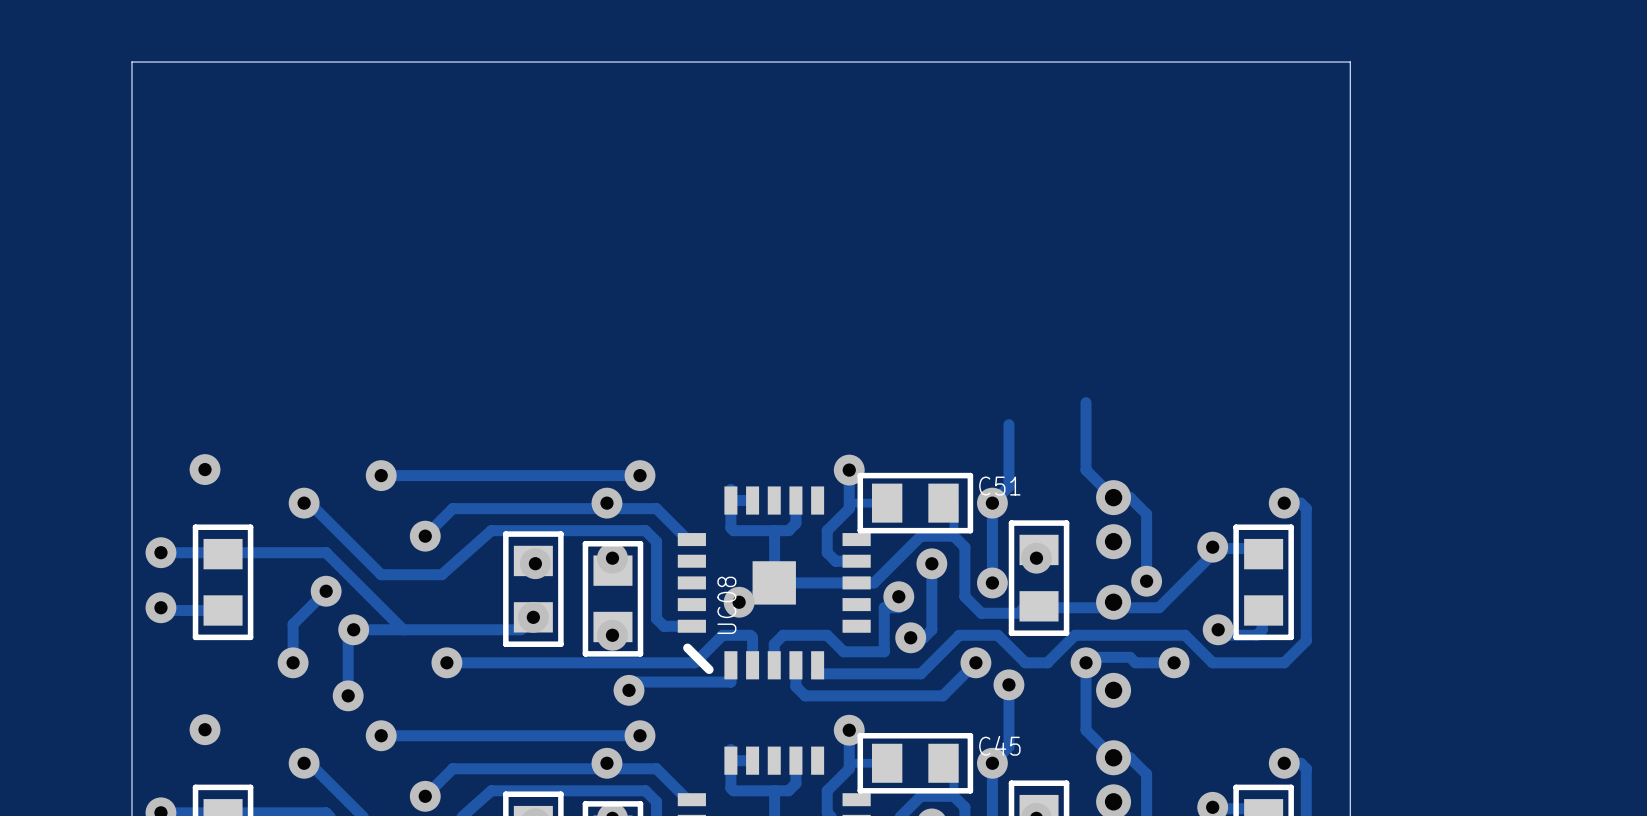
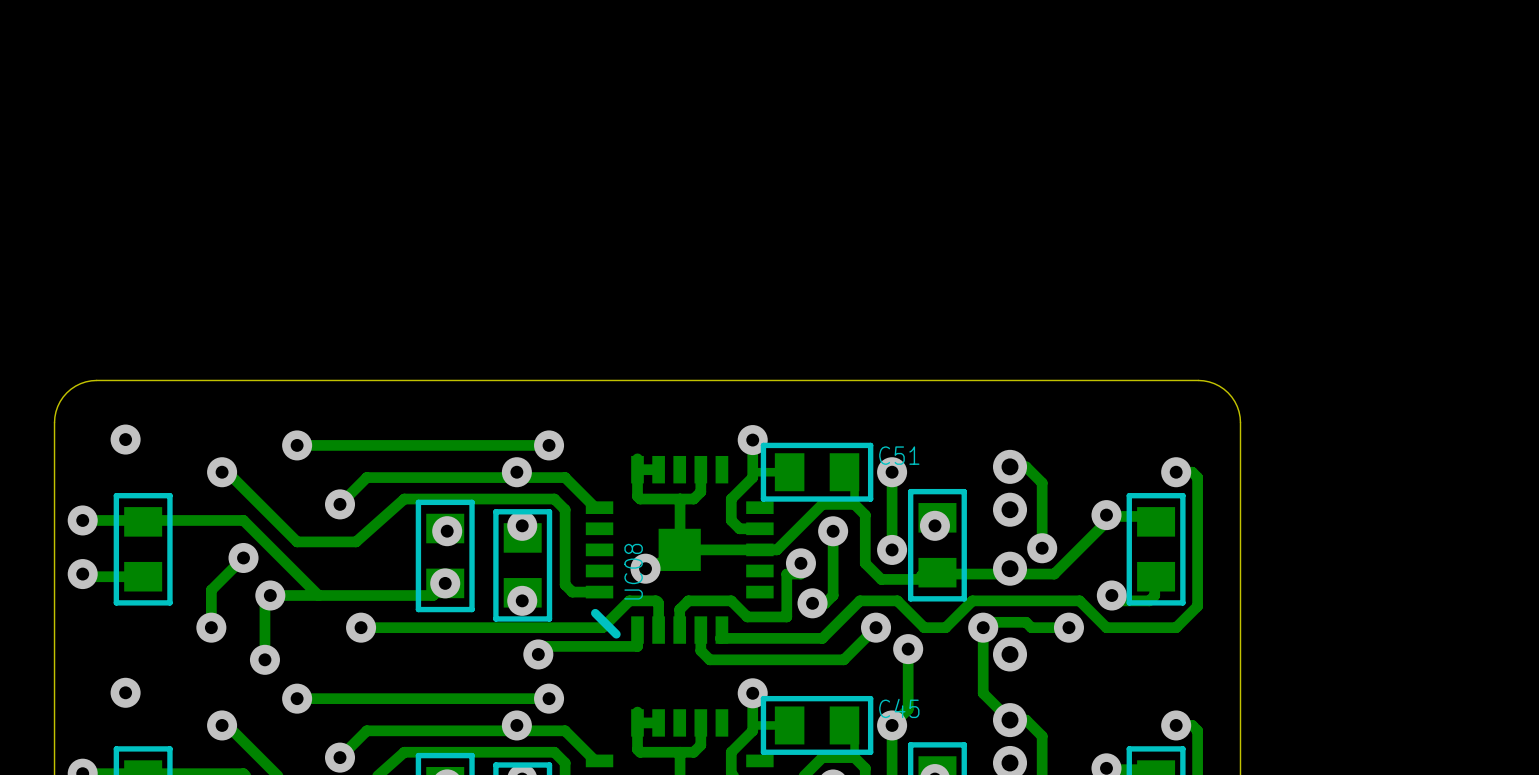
track: (1086, 402) (1086, 470) (1113, 497) -> none
track: (1008, 424) (1008, 486) (992, 503) -> none
board edge: (1350, 452) (1350, 62) (132, 62) (132, 452) -> (1240, 422) (1237, 406) (1228, 392) (1214, 383) (1198, 380) (96, 380) (80, 383) (66, 392) (57, 406) (54, 422)

